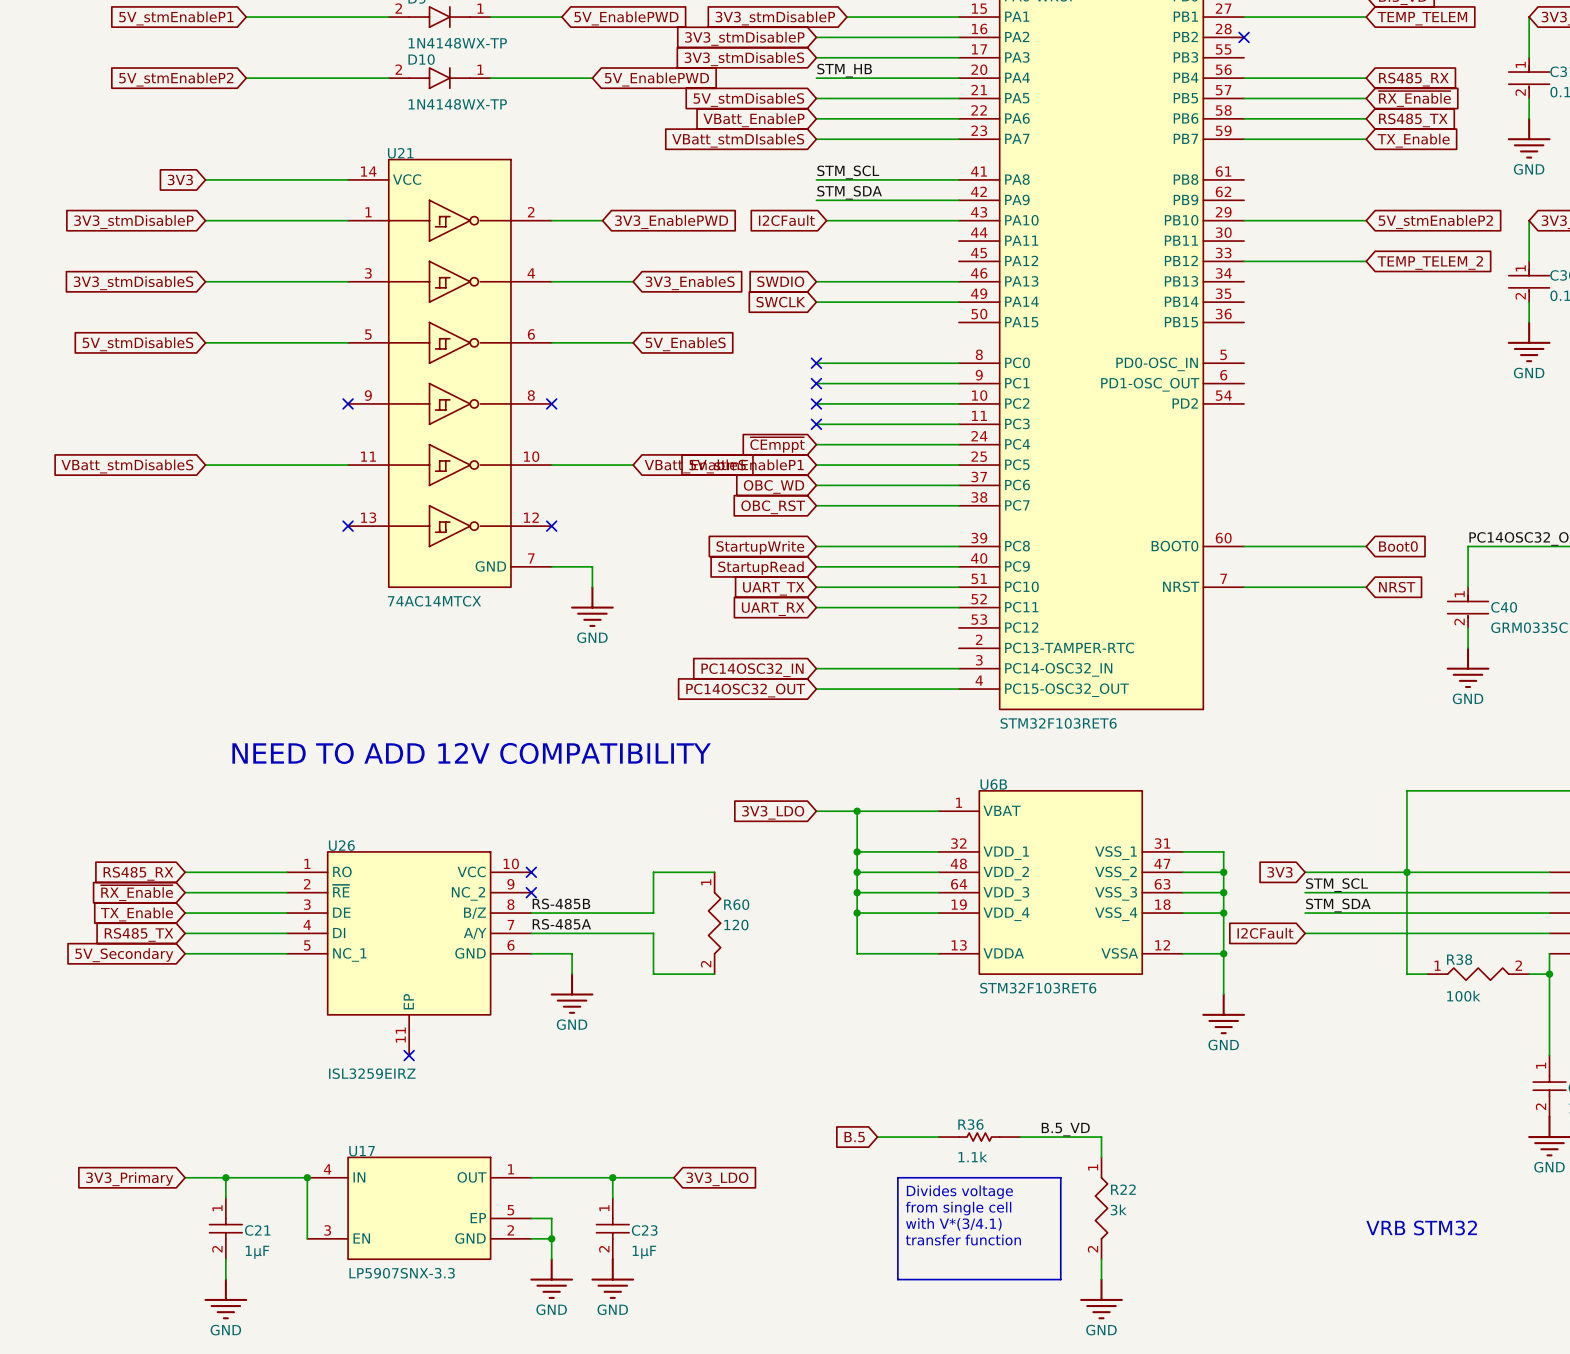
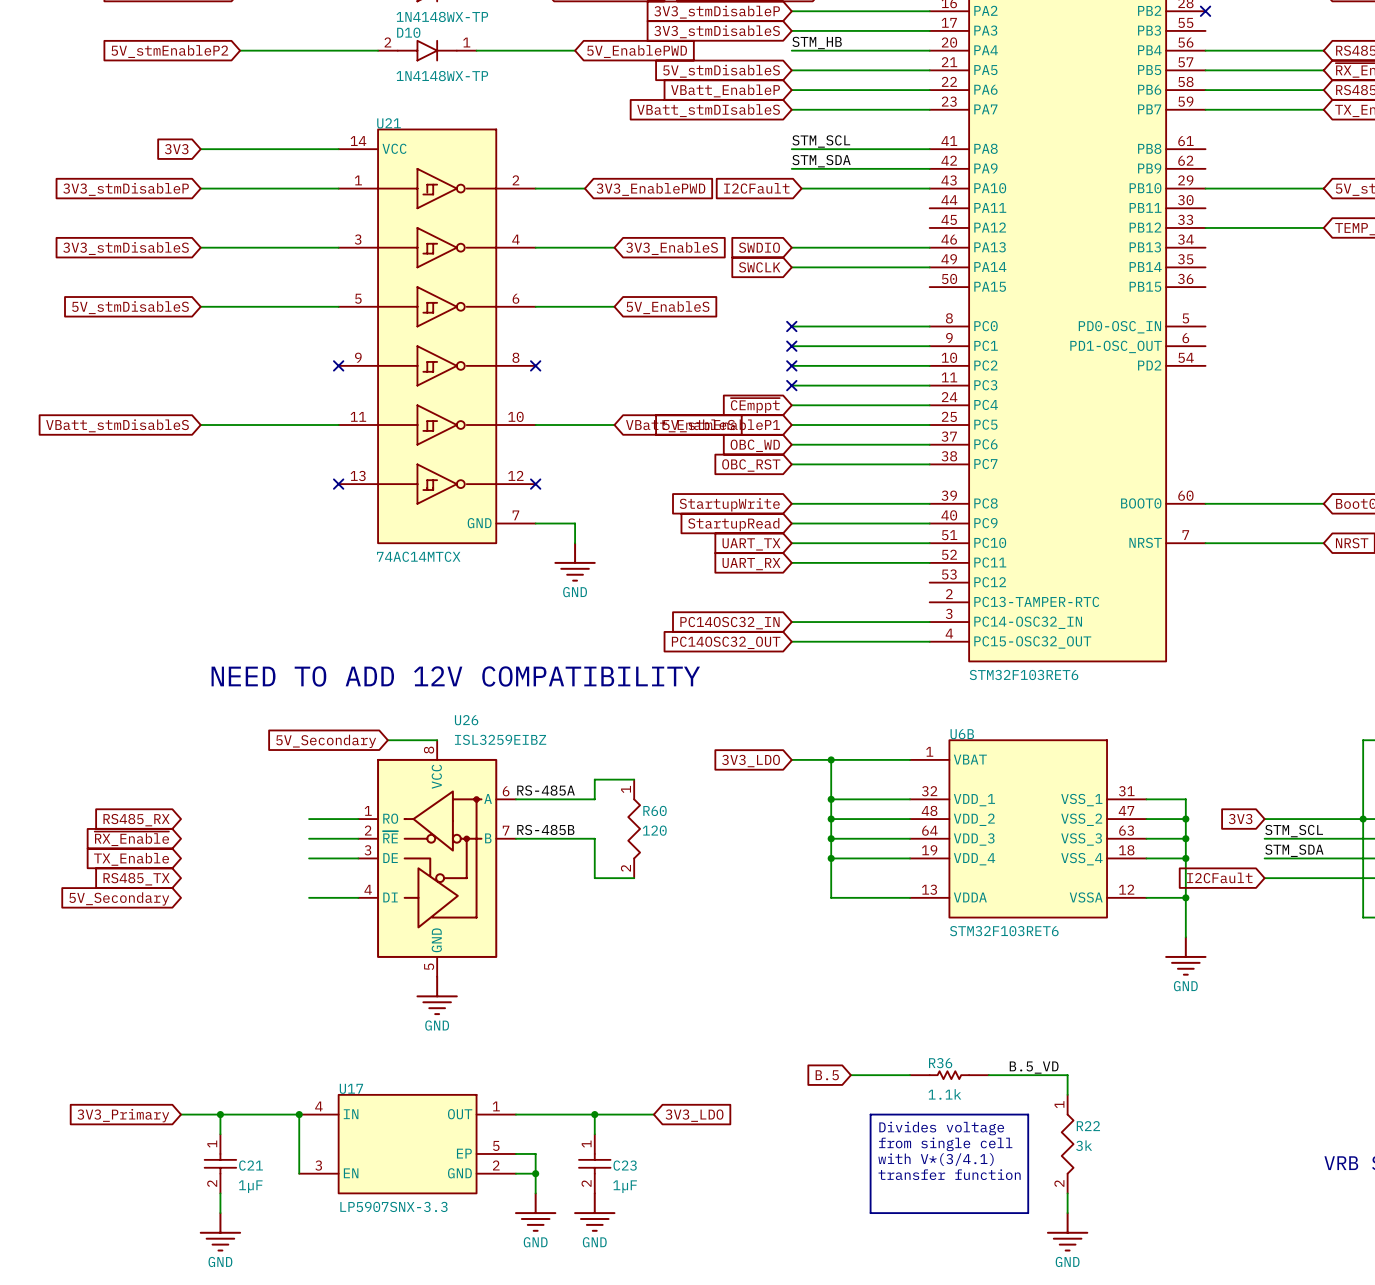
text position: NEED TO ADD 12V COMPATIBILITY (471, 753) -> NEED TO ADD 12V COMPATIBILITY (455, 676)
wire: none -> (387, 740) (437, 740)
global label: none -> 5V_Secondary (326, 741)
wire: none -> (634, 779) (594, 779) (594, 799) (515, 799)
U26 name position: U26 (341, 845) -> U26 (466, 720)
U26 symbol: [286, 851, 532, 1056] -> [358, 740, 516, 977]
wire: (185, 872) (286, 872) -> none
no-connect mark: (531, 872) -> none
wire: (714, 872) (653, 872) (653, 913) (531, 913) -> none
wire: (185, 892) (286, 892) -> none
no-connect mark: (531, 892) -> none
label position: RS-485B (561, 903) -> RS-485B (545, 829)
wire: (185, 913) (286, 913) -> none
R60 position: (714, 923) -> (634, 828)
label position: RS-485A (561, 924) -> RS-485A (546, 790)
wire: (185, 933) (286, 933) -> none
wire: (531, 933) (612, 933) -> (515, 838) (594, 838) (594, 878)
wire: (653, 933) (653, 974) (714, 974) -> none
wire: (185, 953) (286, 953) -> none
wire: (531, 953) (572, 953) (572, 974) -> none
power symbol position: GND (572, 993) -> GND (437, 995)
no-connect mark: (409, 1055) -> none
U26 value: ISL3259EIRZ (372, 1073) -> ISL3259EIBZ (500, 739)

